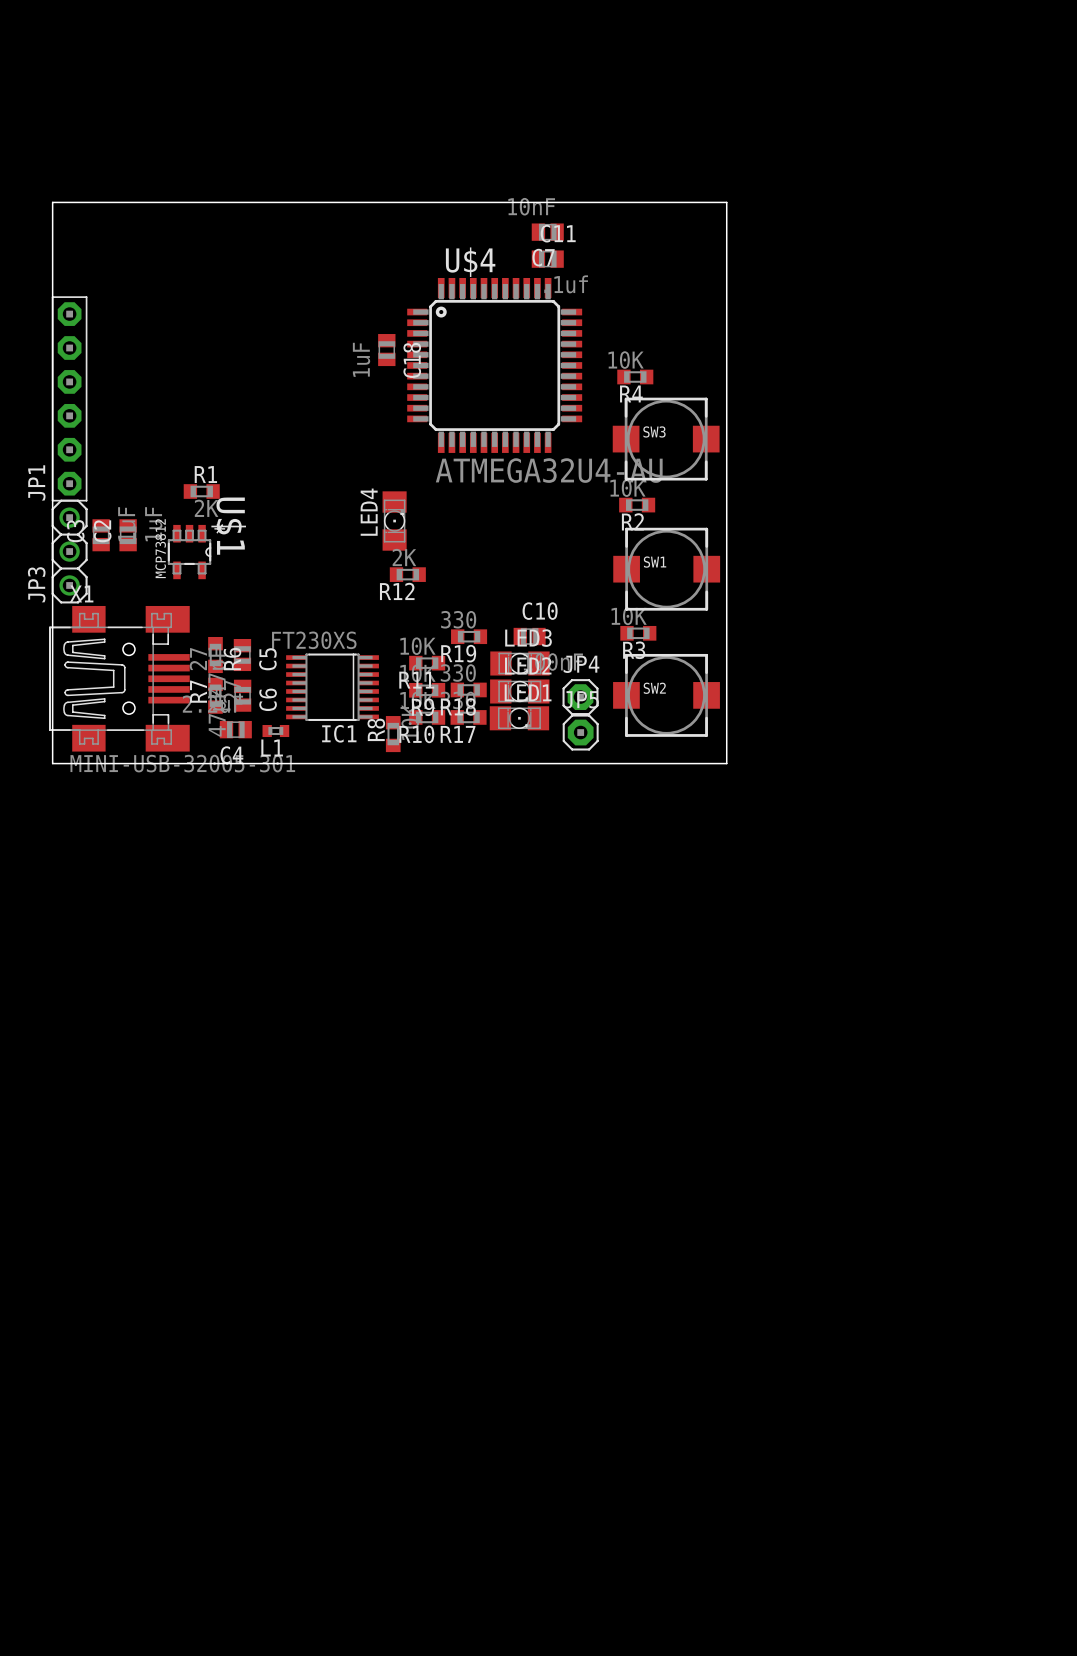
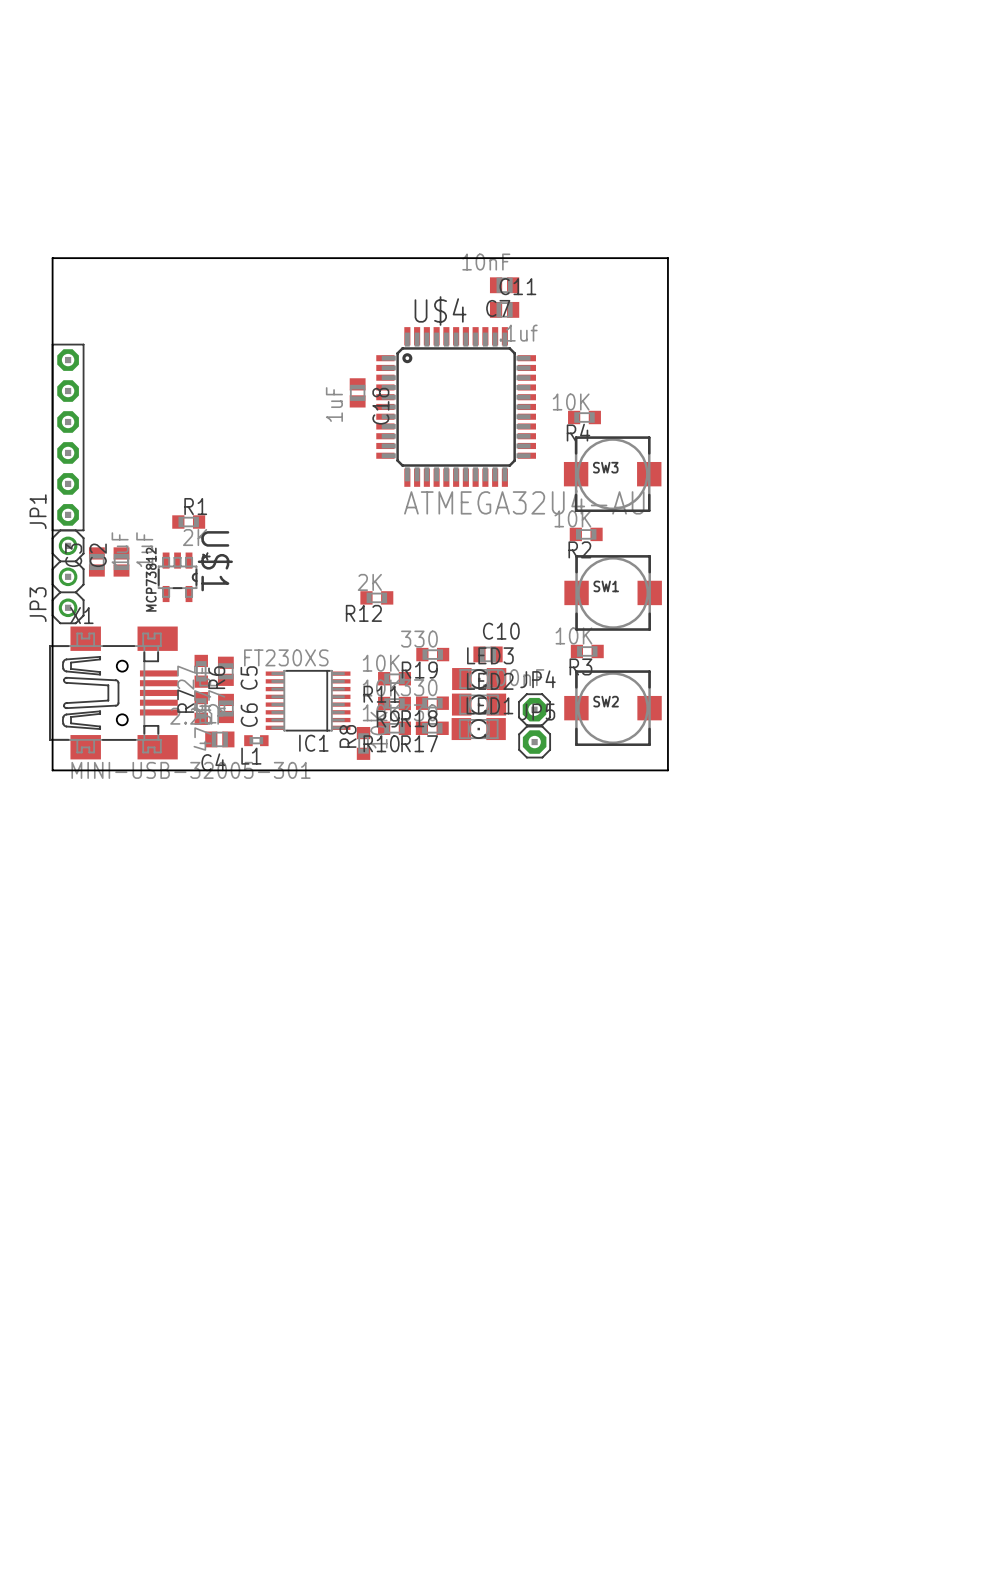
LED4: (394, 521) -> none

